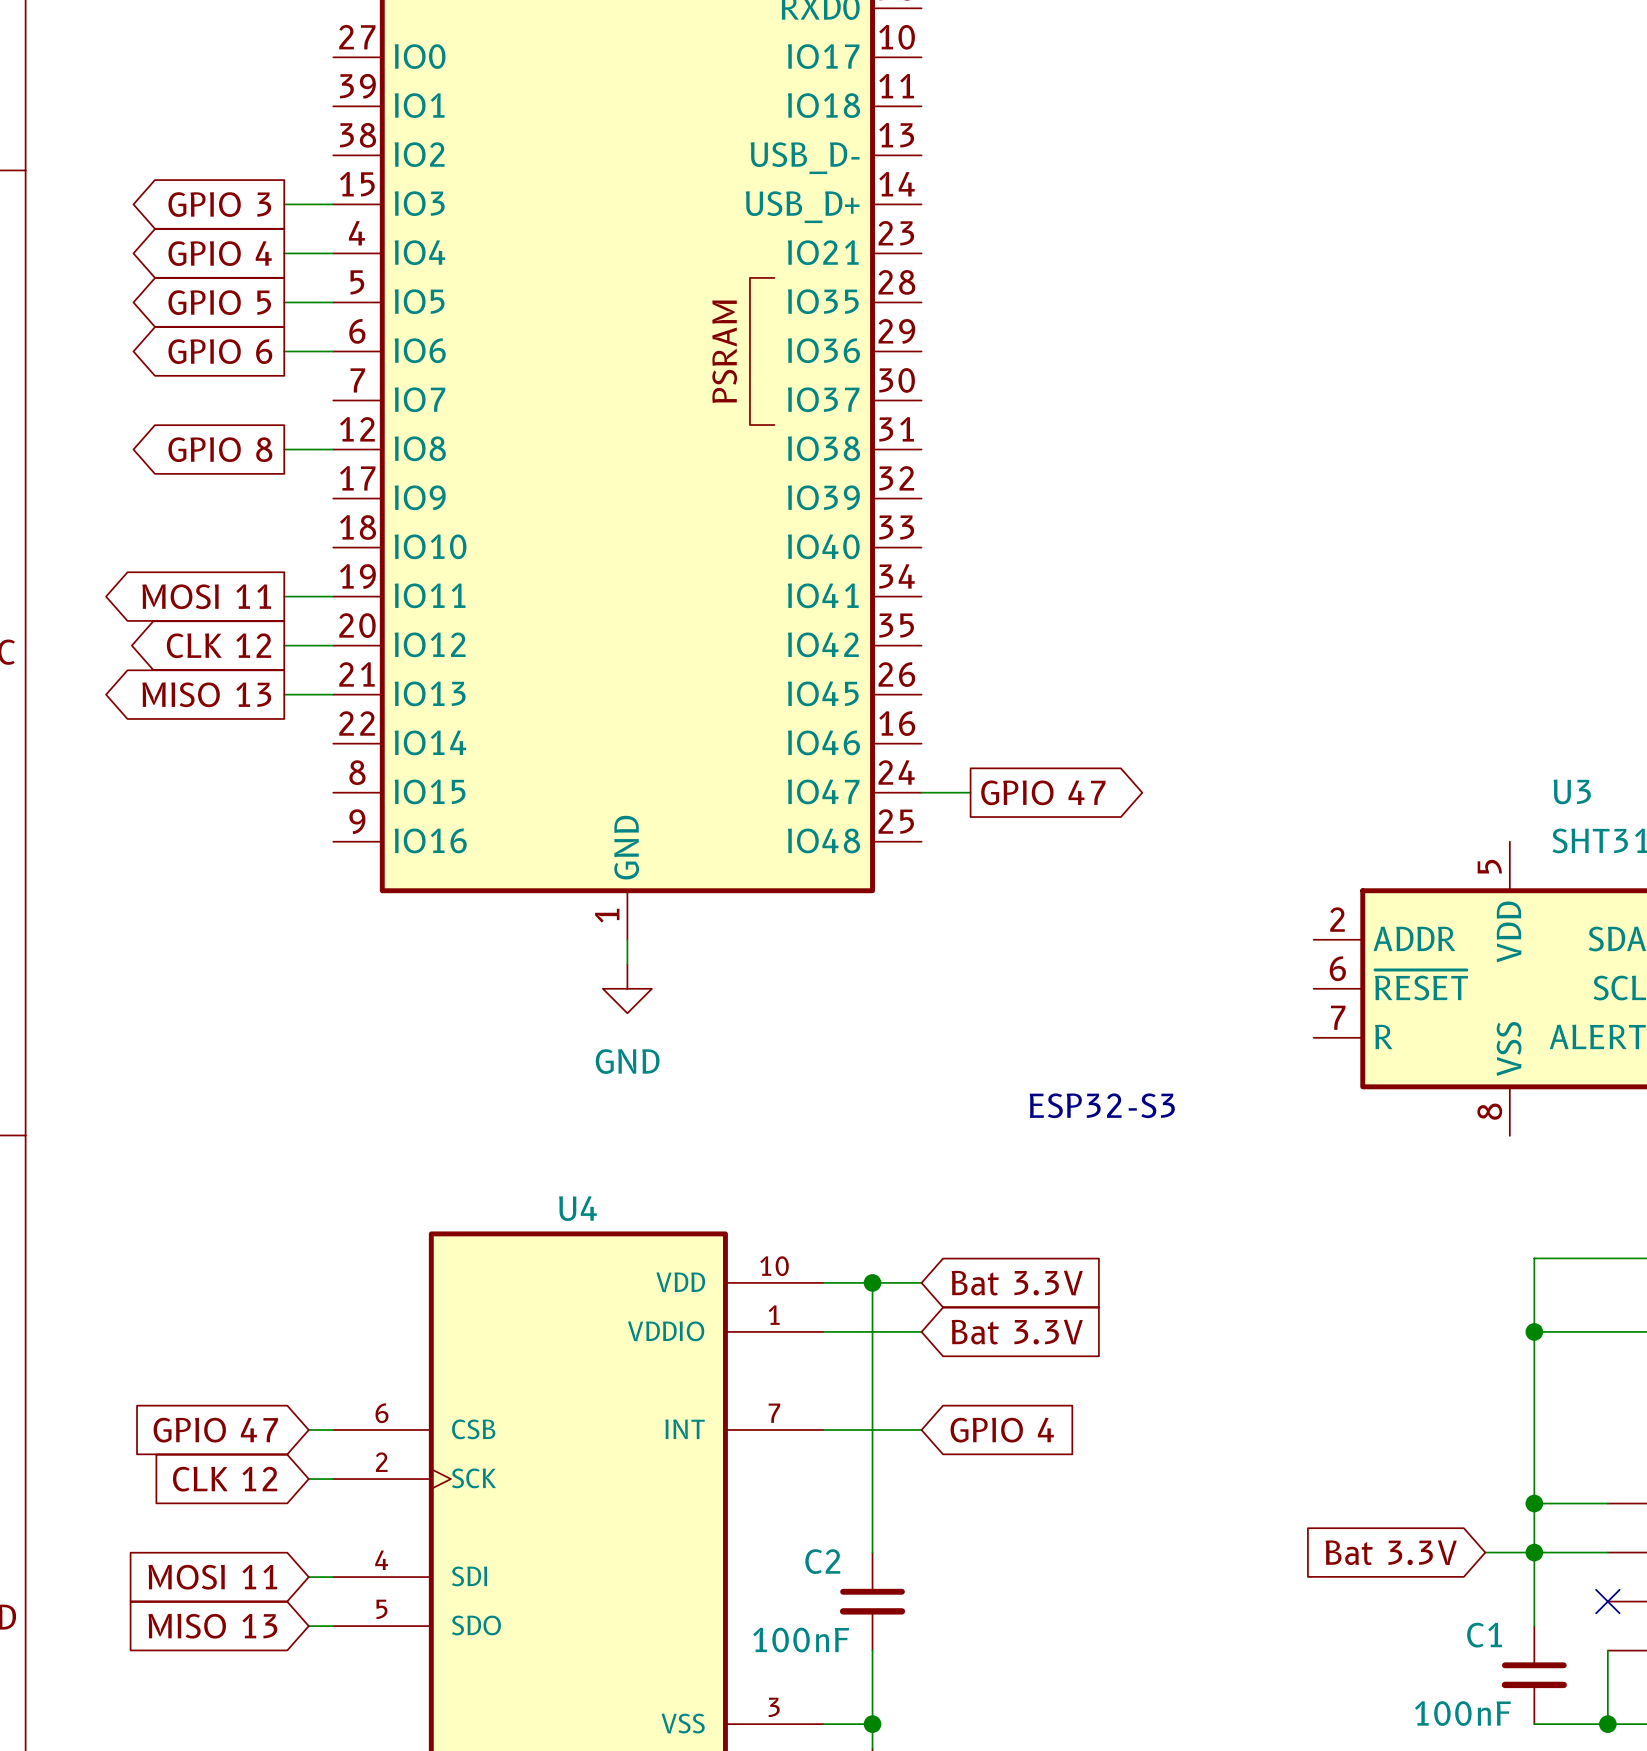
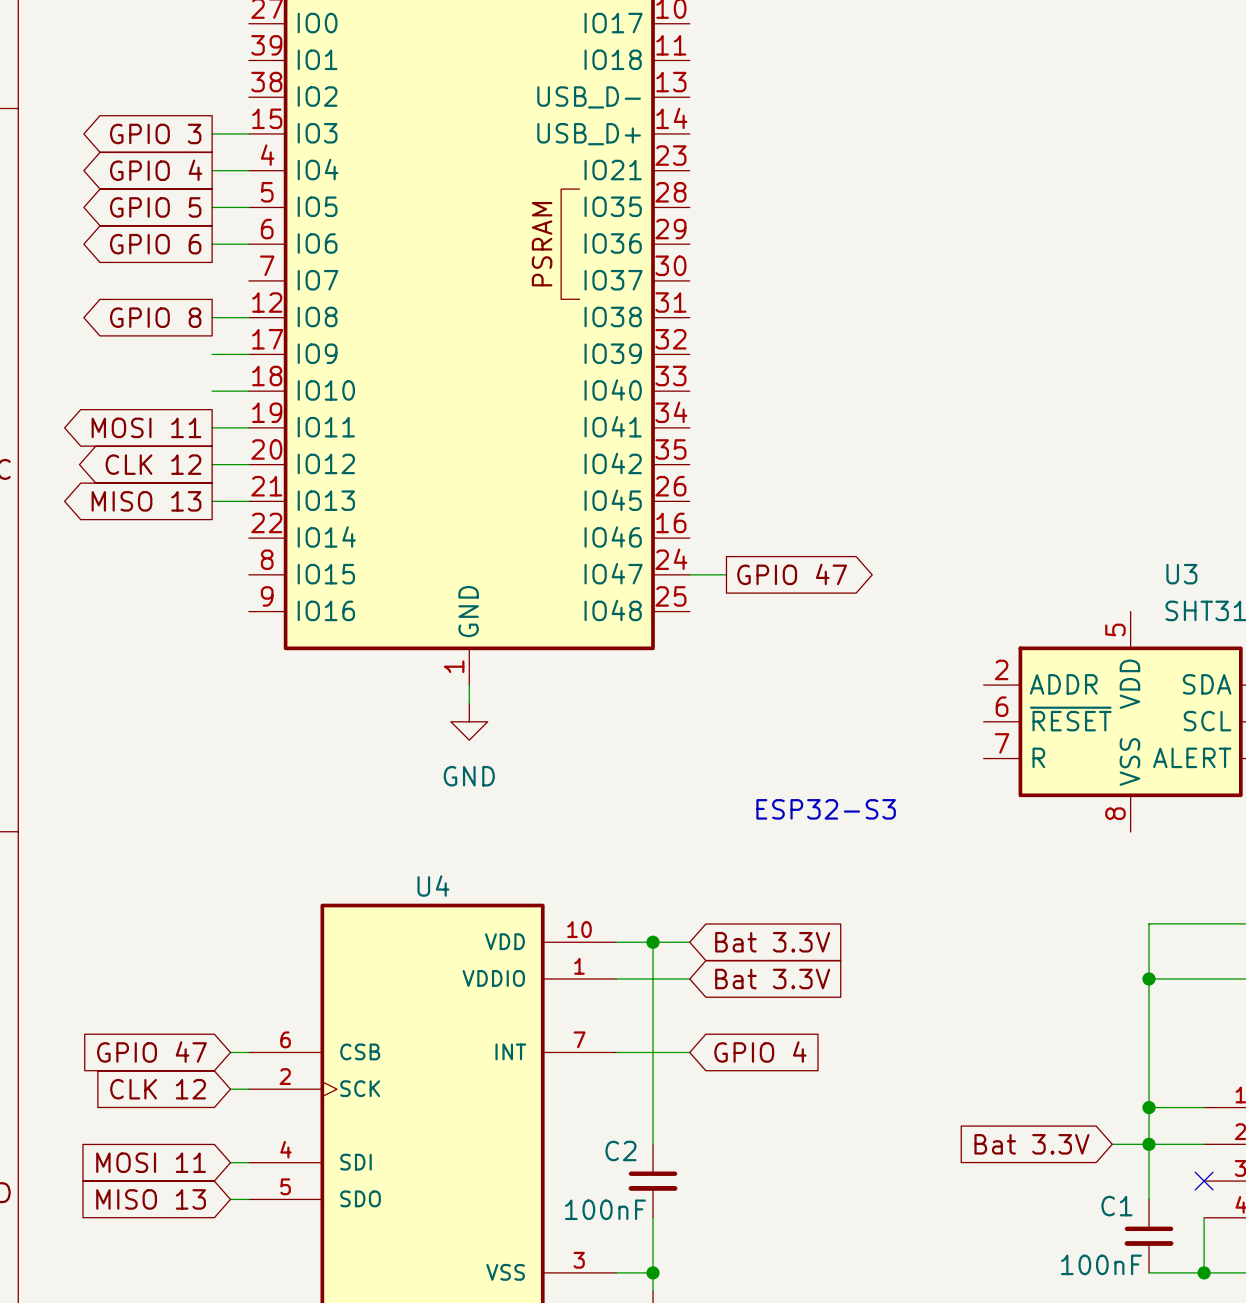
wire: none -> (212, 354) (248, 354)
wire: none -> (212, 391) (248, 391)

